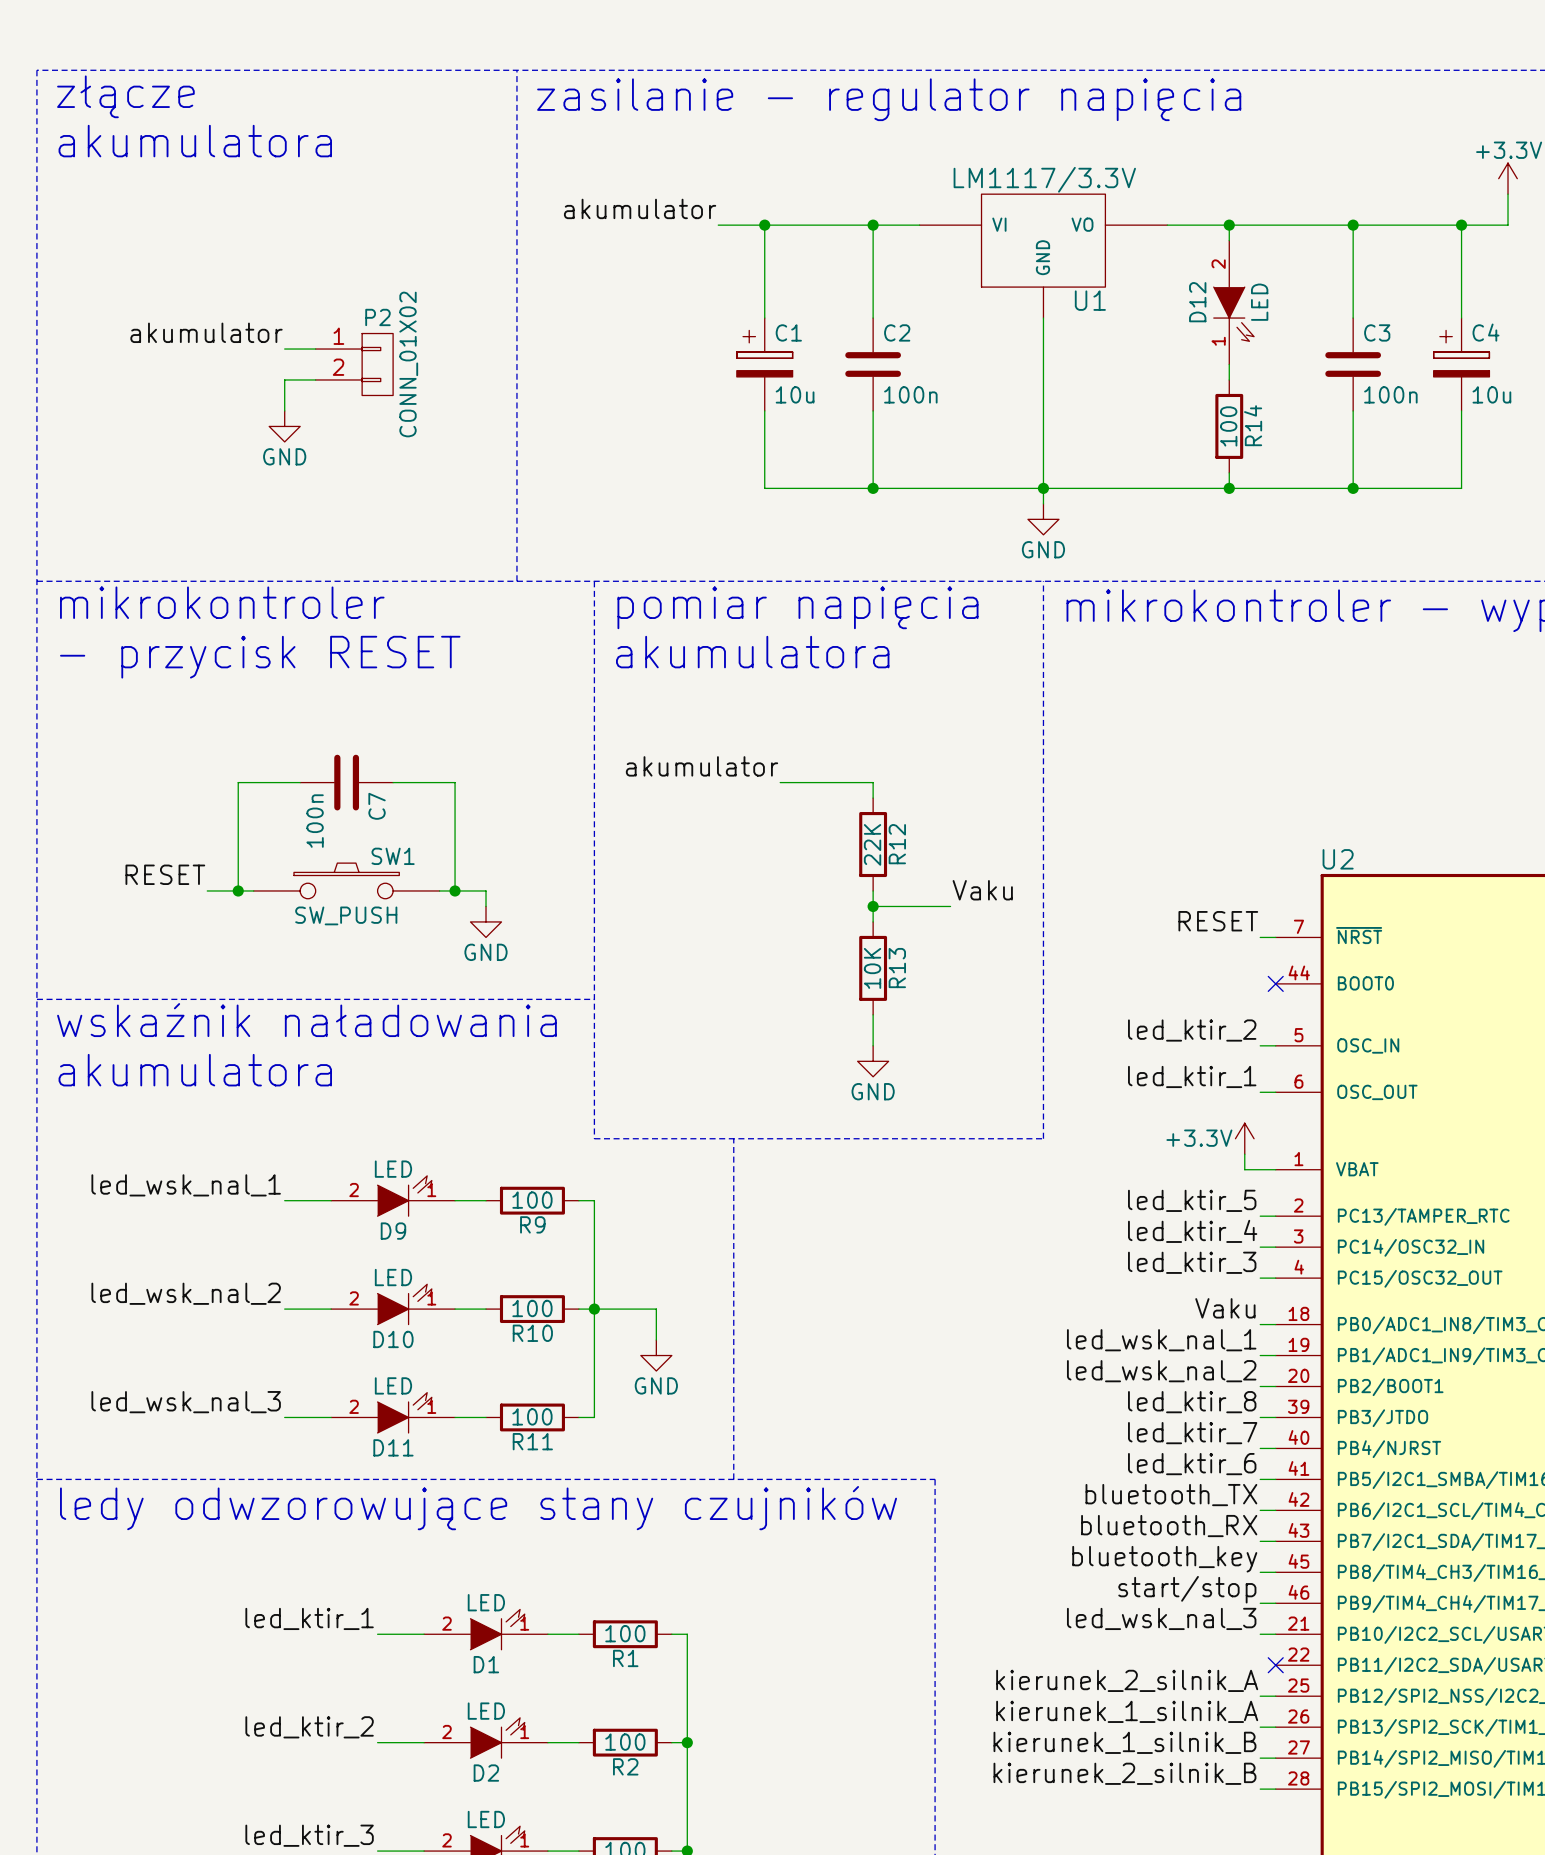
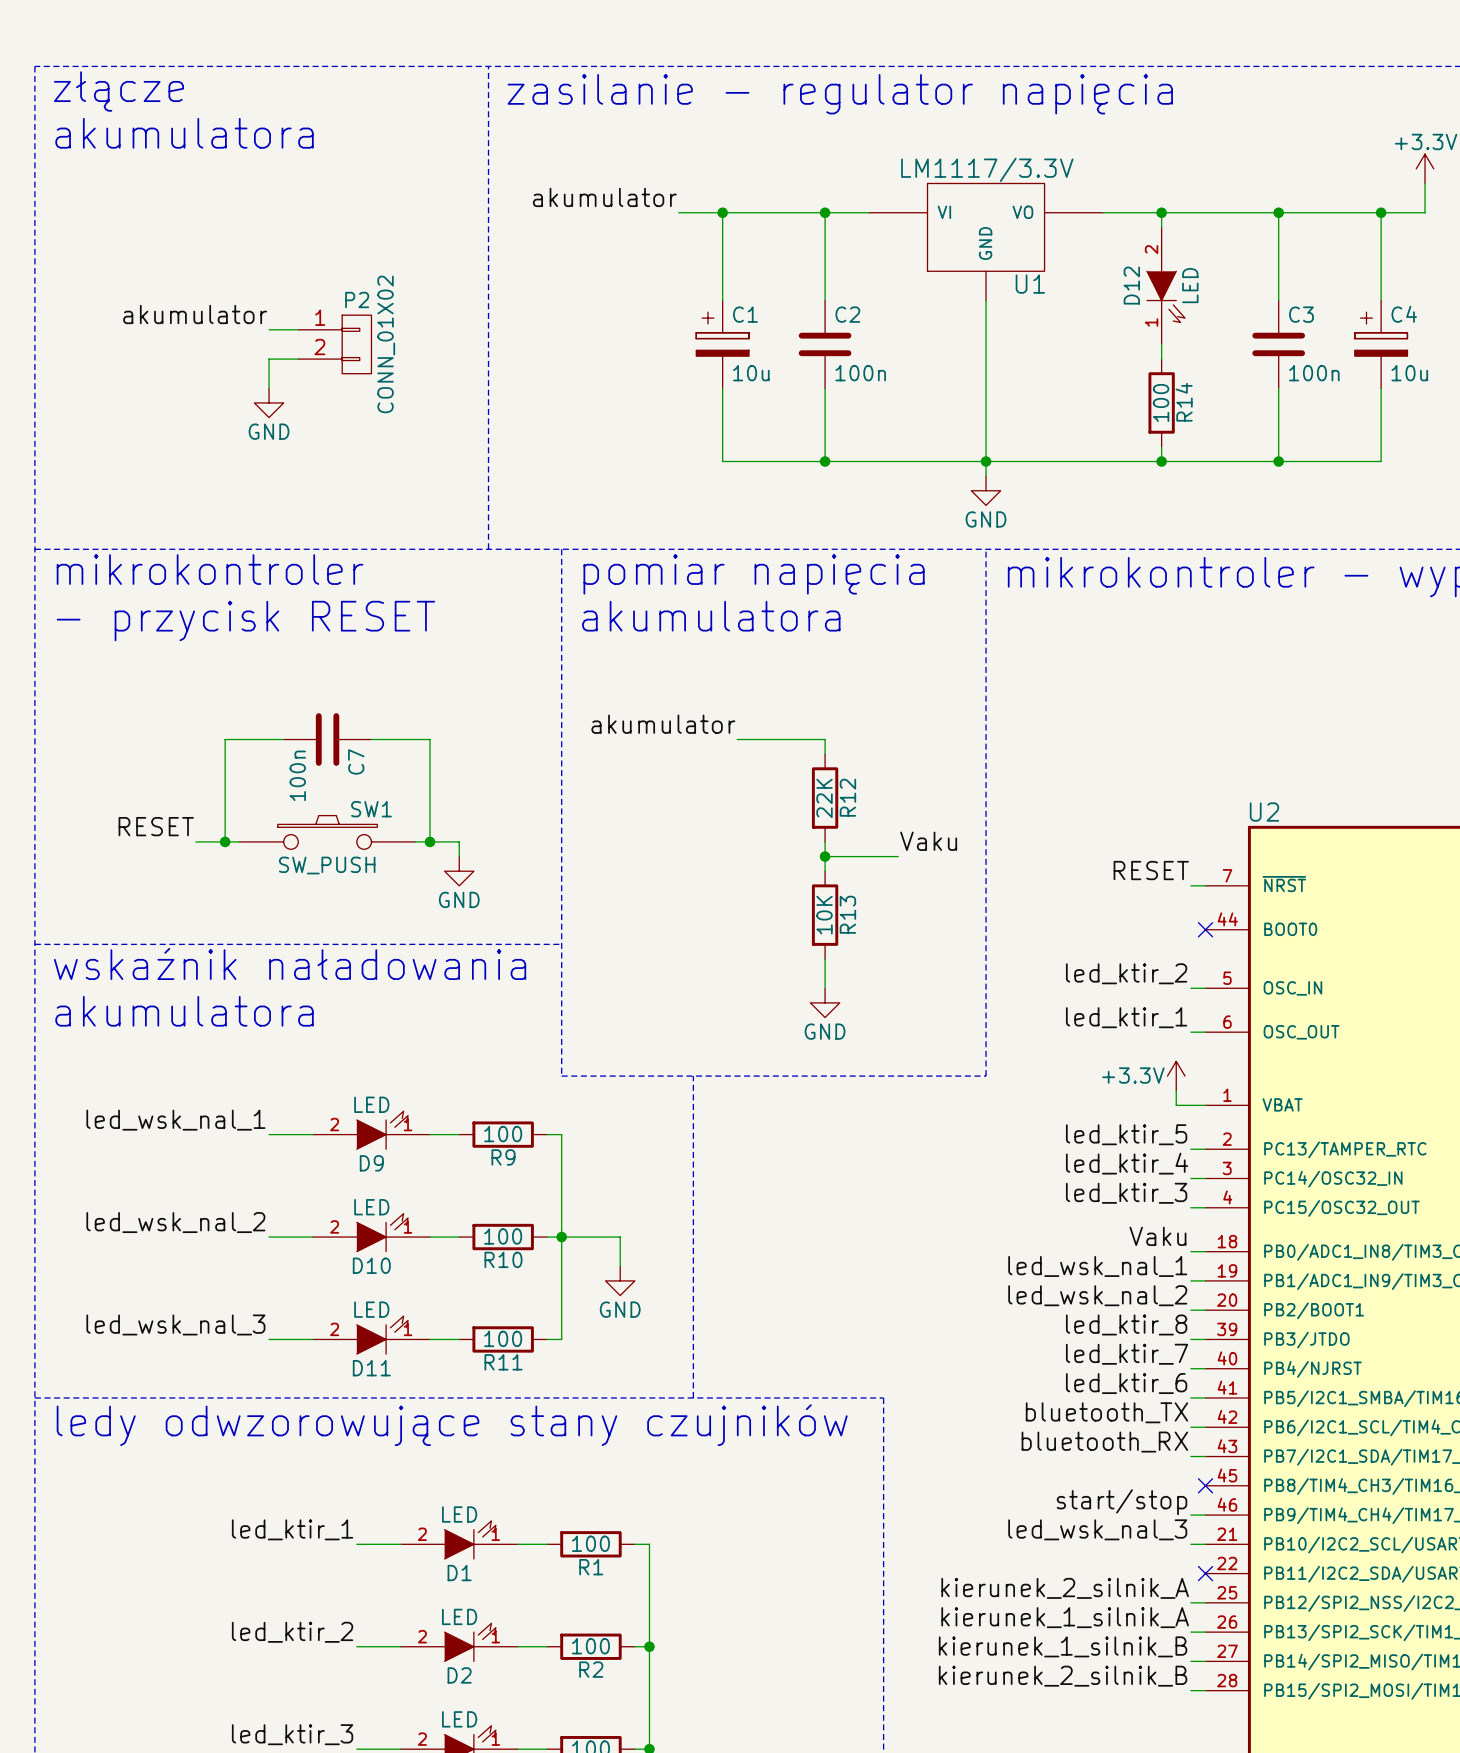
label: bluetooth_key (1164, 1559) -> none
wire: (1260, 1572) (1275, 1572) -> none
no-connect mark: none -> (1205, 1485)

